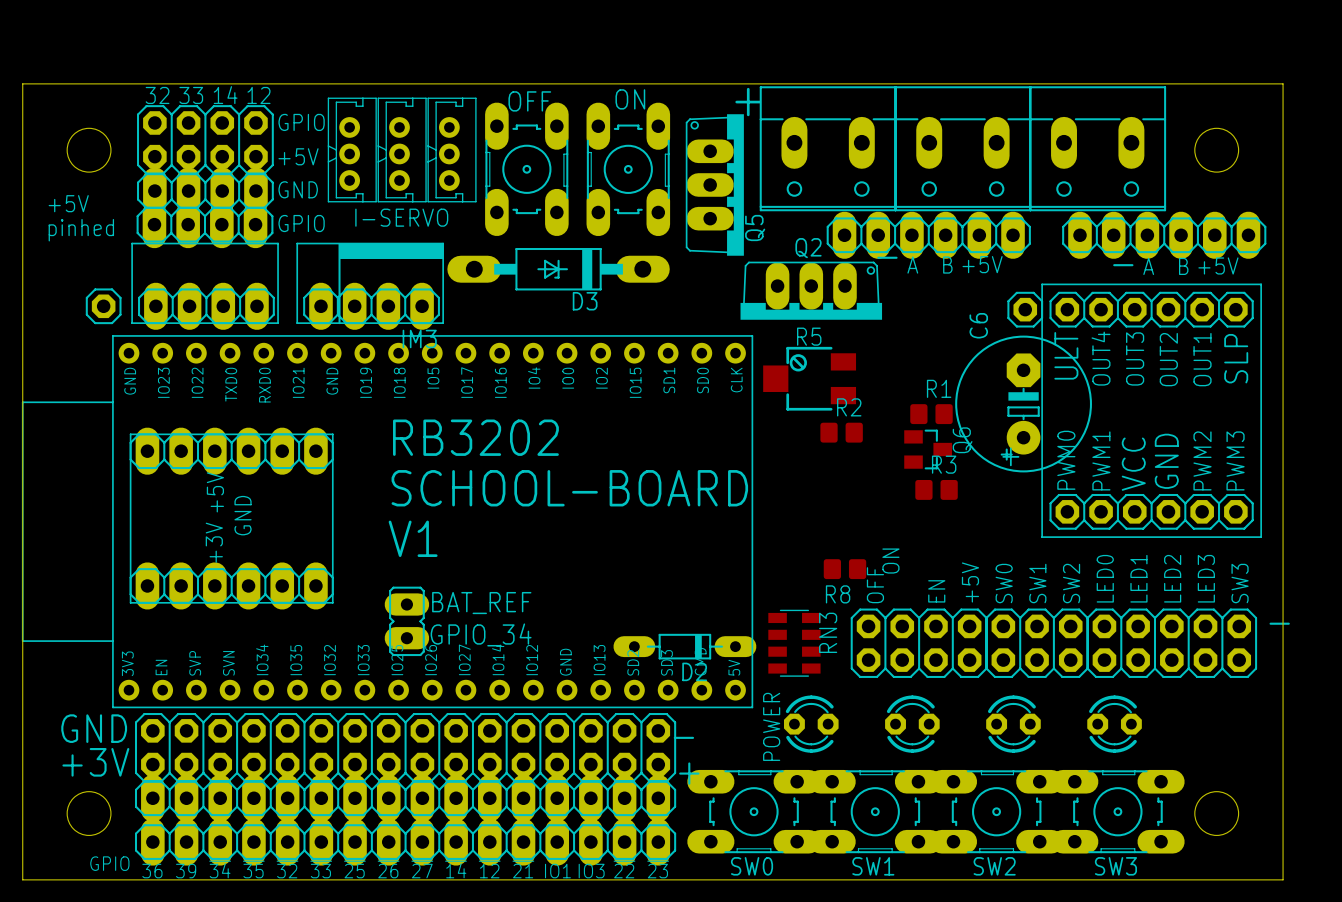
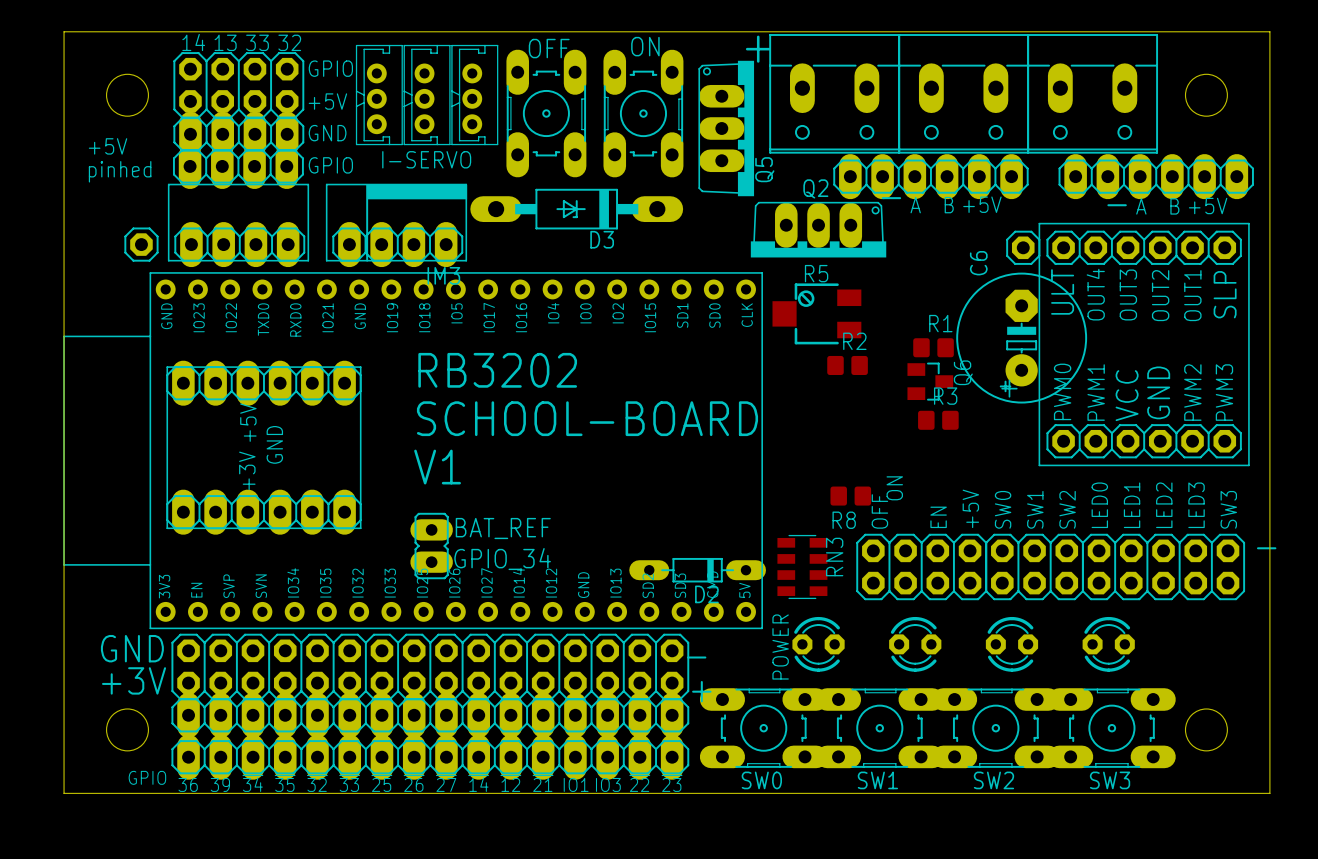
text: 32 (157, 95) -> 14 (193, 42)
text: 33 (191, 95) -> 13 (225, 42)
text: 14 (225, 95) -> 33 (257, 42)
text: 12 (258, 95) -> 32 (289, 42)

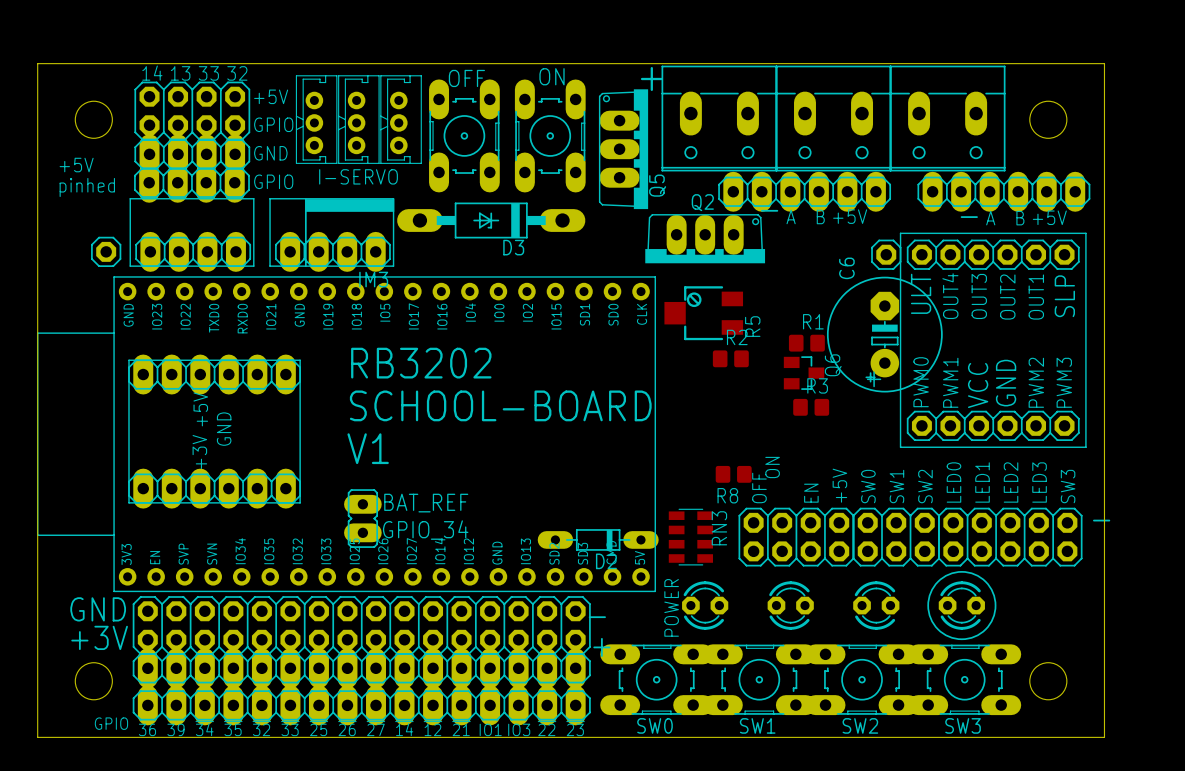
text: GPIO (330, 68) -> +5V (271, 96)
text: +5V (327, 101) -> GPIO (273, 124)
R5 name rotation: 0° (816, 273) -> 90° counterclockwise (752, 326)
R5 name position: R5 (816, 273) -> R5 (752, 326)
drawing: none -> [927, 571, 997, 641]

